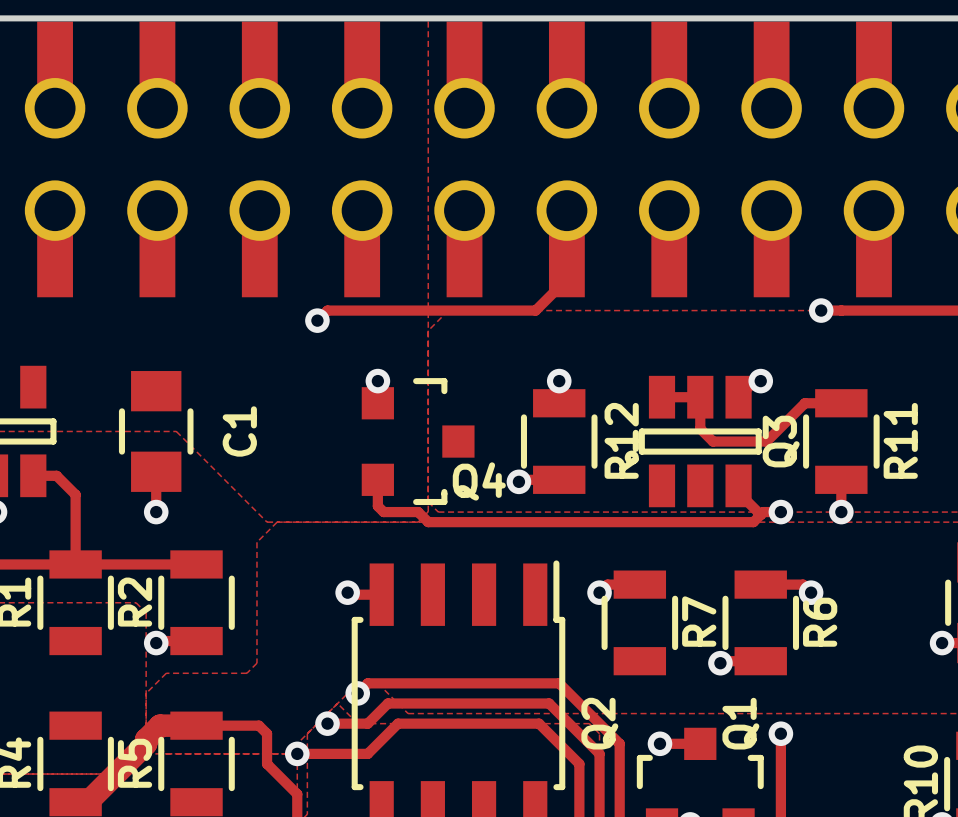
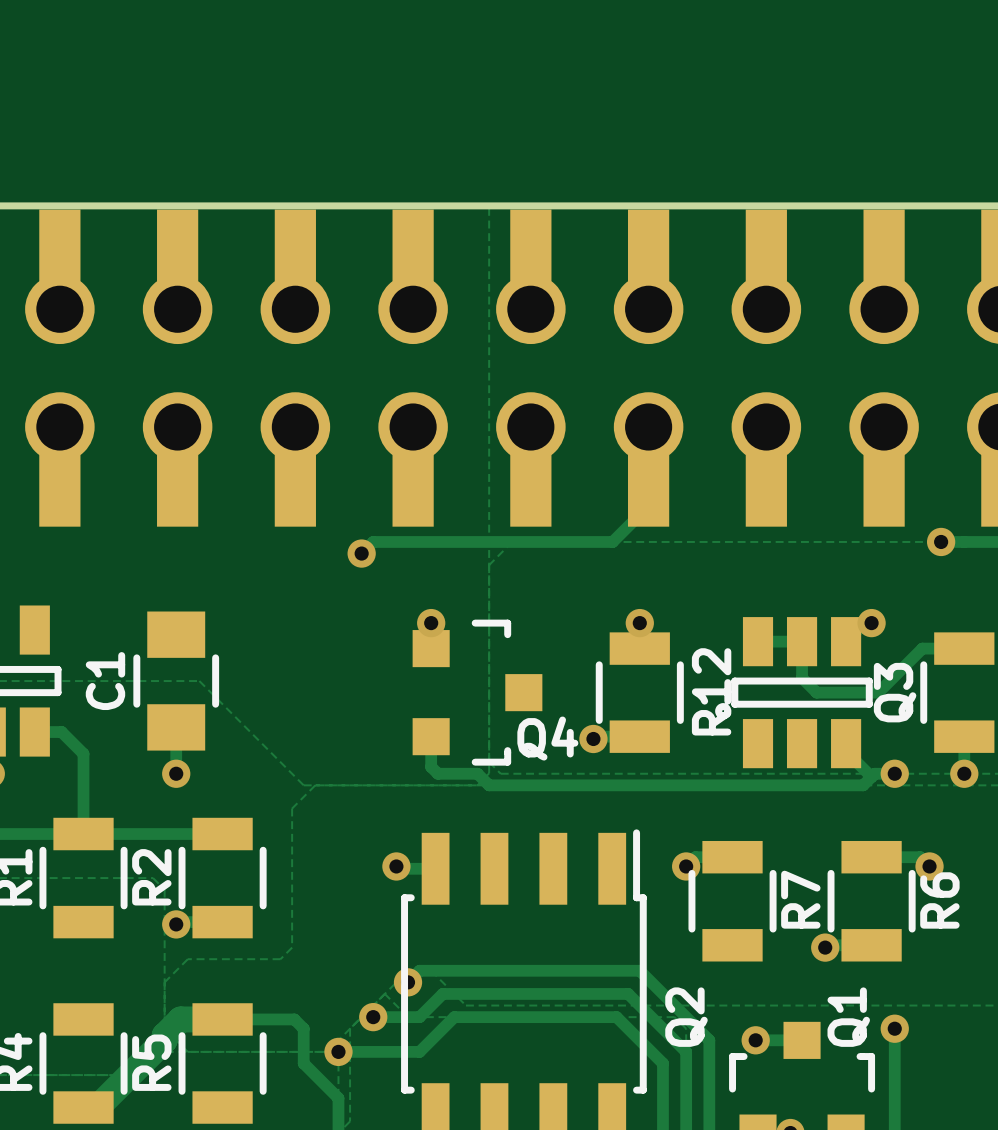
C1 name position: C1 (239, 431) -> C1 (105, 681)

